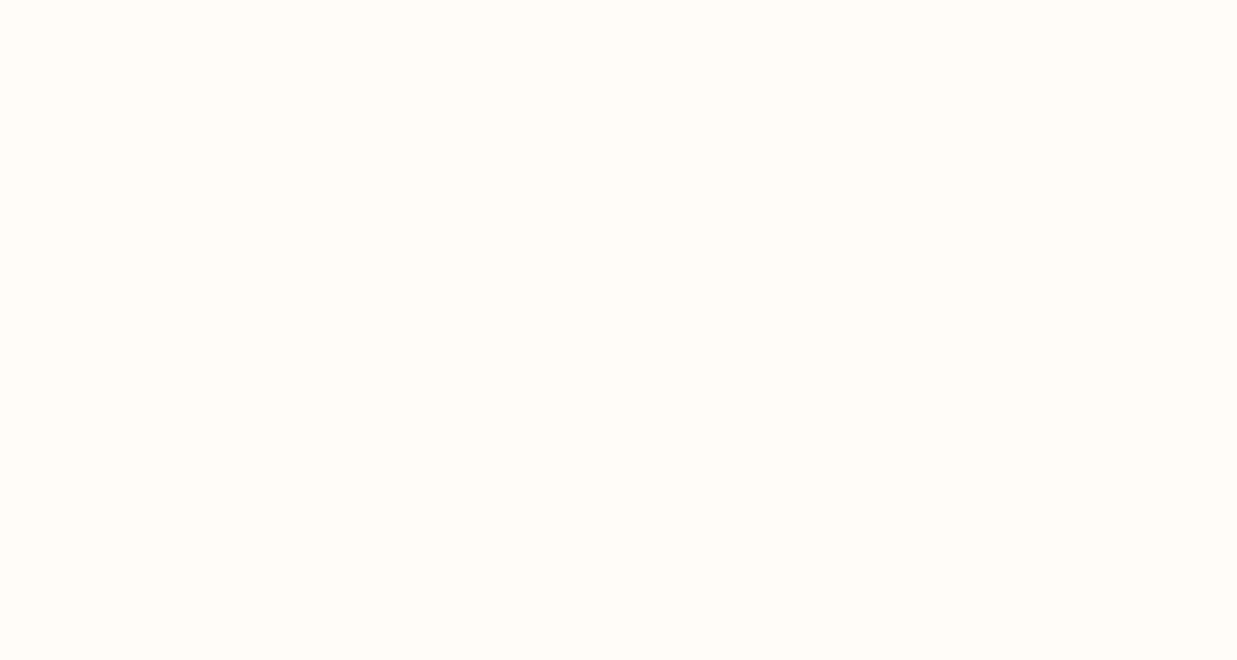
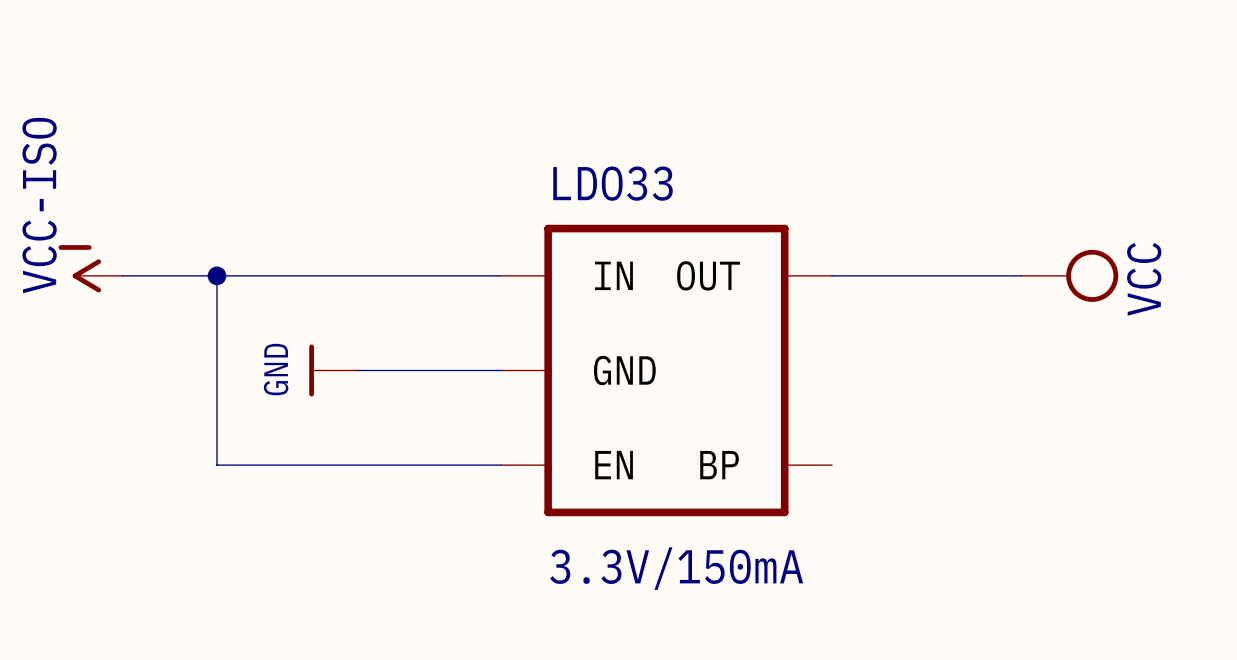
power symbol: none -> VCC-ISO (90, 268)
wire: none -> (122, 275) (500, 275)
wire: none -> (216, 275) (216, 465) (500, 465)
junction: none -> (216, 275)
wire: none -> (832, 275) (1021, 275)
power symbol: none -> VCC (1069, 275)
power symbol: none -> GND (334, 370)
wire: none -> (358, 370) (500, 370)
LDO33: none -> 3.3V/150mA (666, 370)

